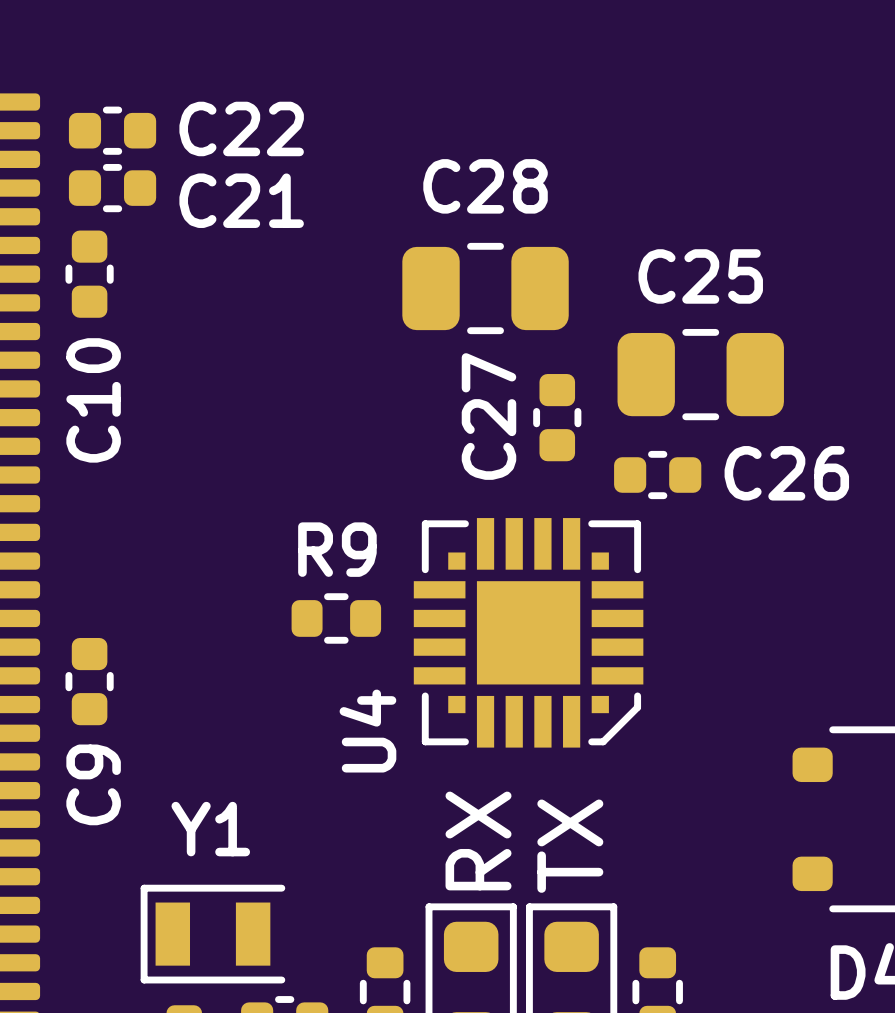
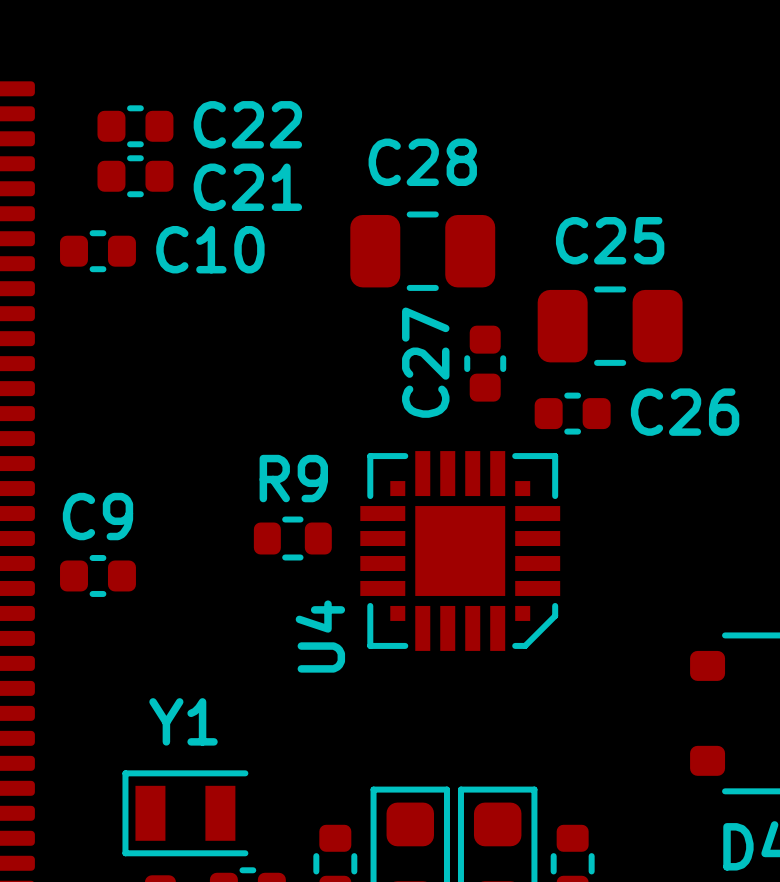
C22 position: (112, 130) -> (135, 126)
C21 position: (112, 188) -> (135, 176)
C10 rotation: 0° (89, 274) -> 90° clockwise (97, 251)
C10 name position: C10 (93, 400) -> C10 (210, 249)
C9 rotation: 0° (89, 681) -> 90° clockwise (97, 575)
C9 name position: C9 (93, 784) -> C9 (97, 516)
text: RX (478, 840) -> none
text: TX (570, 846) -> none

